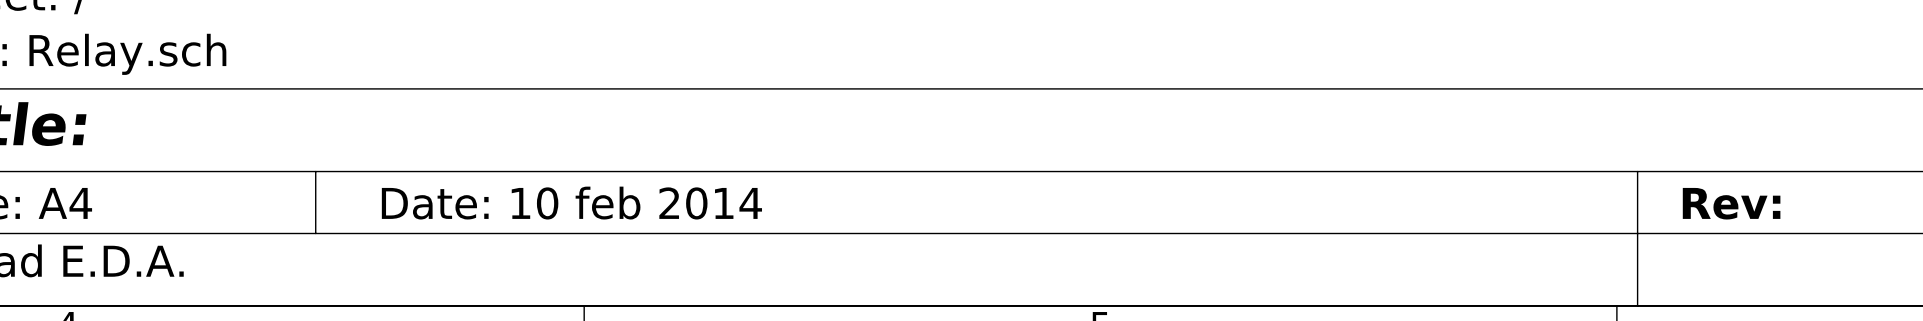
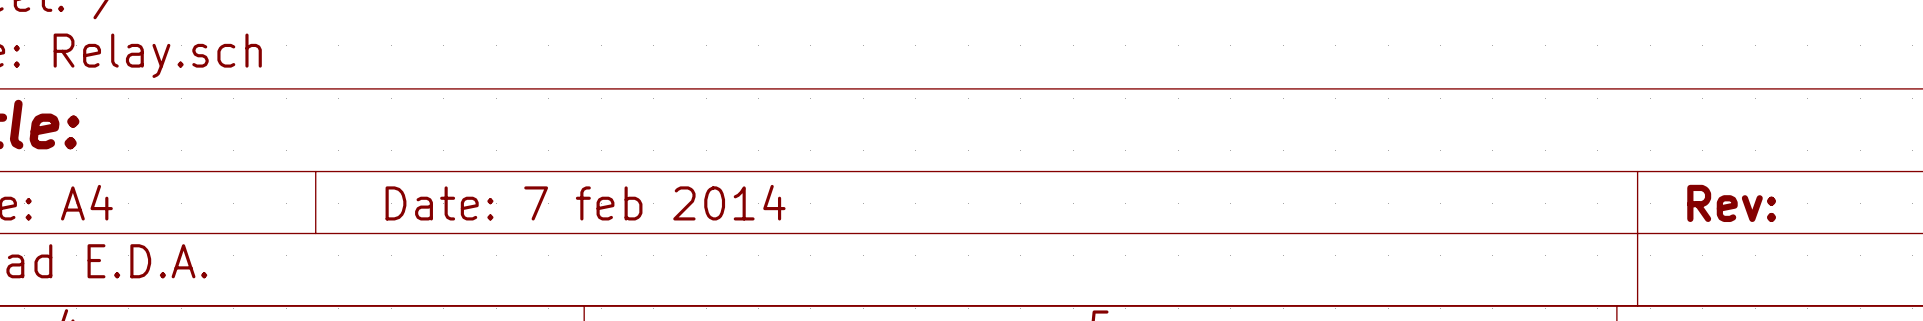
title block: Date: 10 feb 2014 (571, 203) -> Date: 7 feb 2014 (585, 202)

